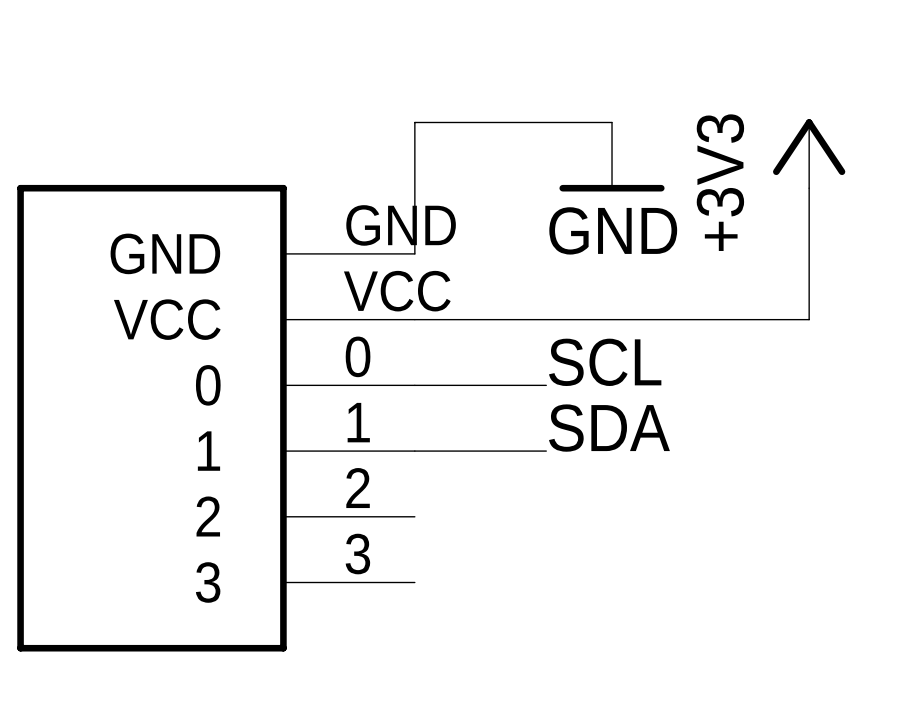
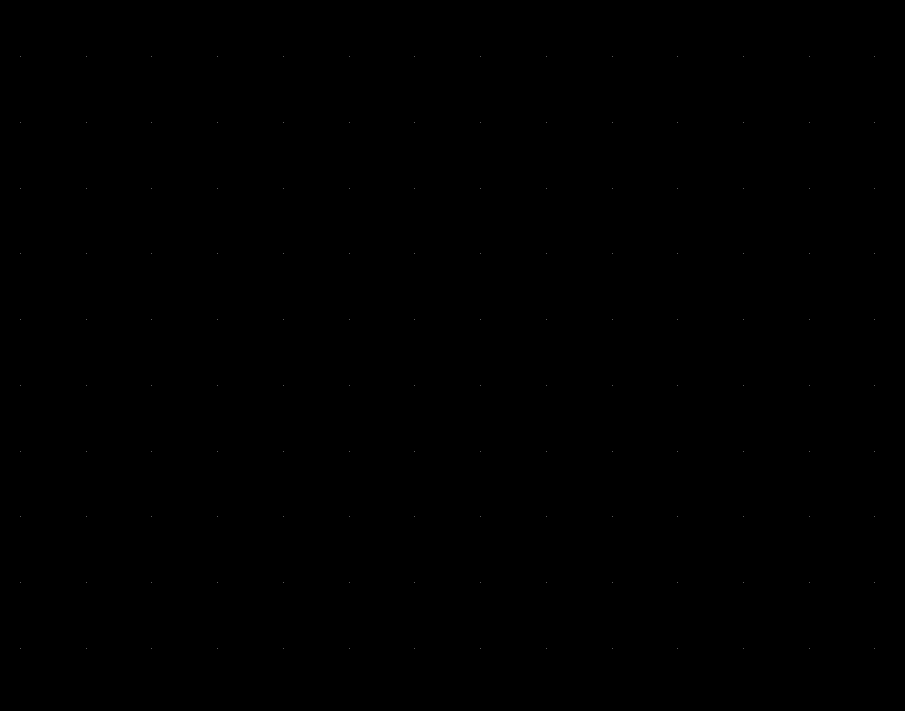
wire: (612, 122) (414, 122) (414, 253) -> none
power symbol: +3V3 (809, 153) -> none
power symbol: GND (612, 156) -> none
wire: (809, 188) (809, 319) (414, 319) -> none
label: SCL (605, 362) -> none
wire: (414, 385) (546, 385) -> none
part: (216, 418) -> none
label: SDA (609, 428) -> none
wire: (414, 451) (546, 451) -> none

